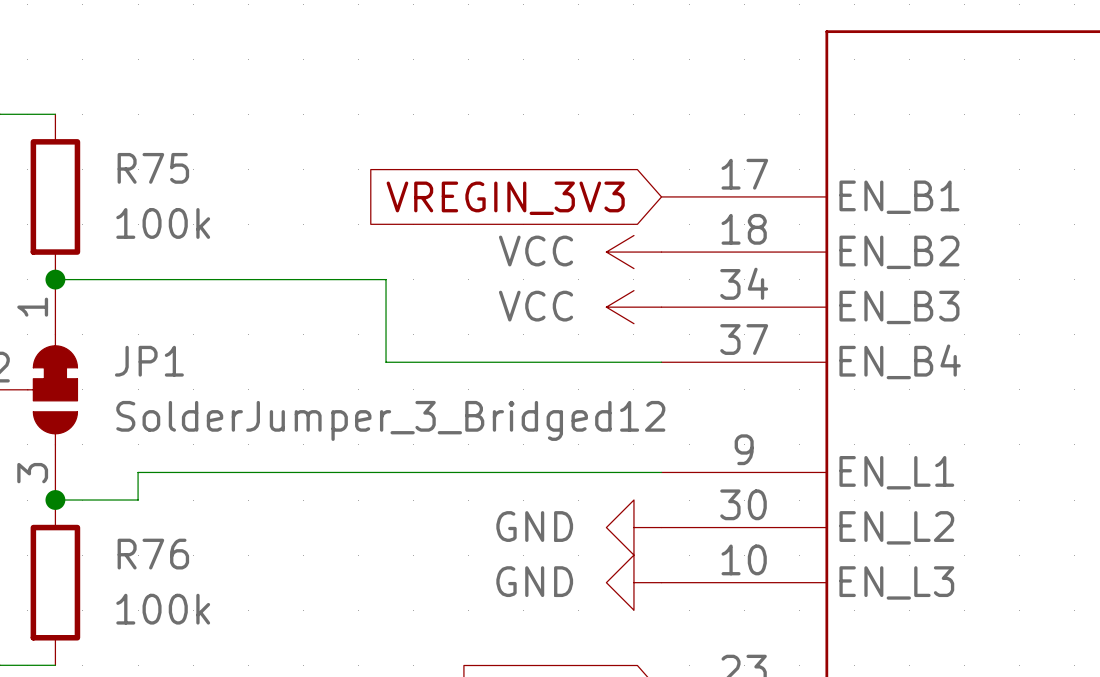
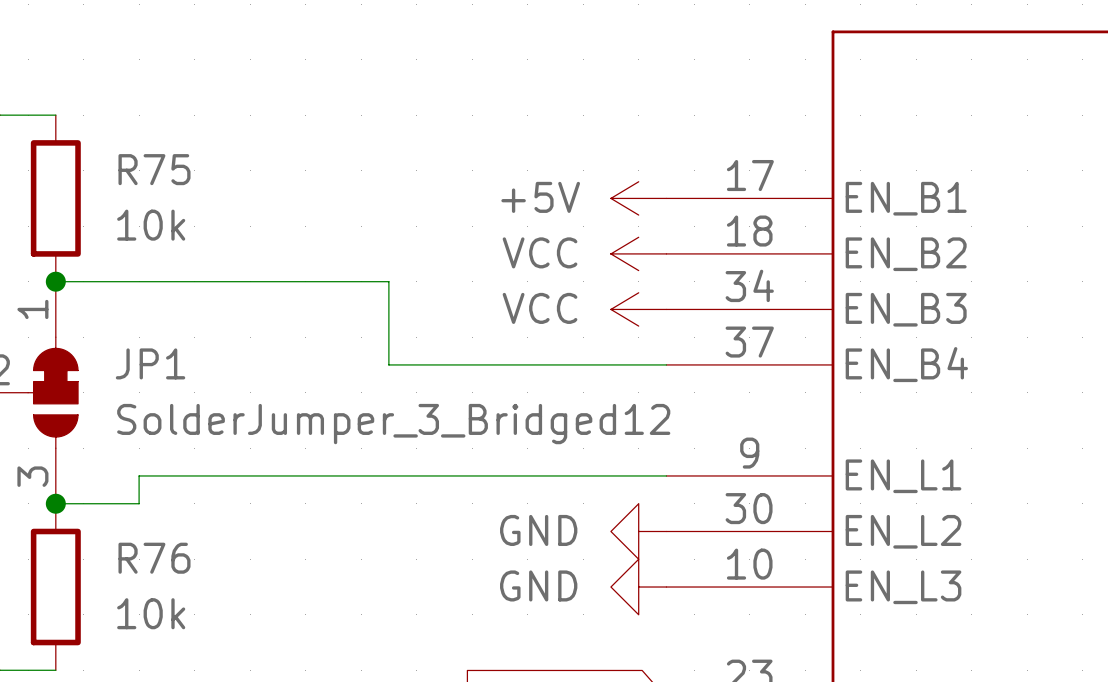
power symbol: none -> +5V (638, 198)
global label: VREGIN_3V3 (505, 198) -> none
R75 value: 100k (163, 223) -> 10k (151, 225)
R76 value: 100k (163, 609) -> 10k (151, 613)

